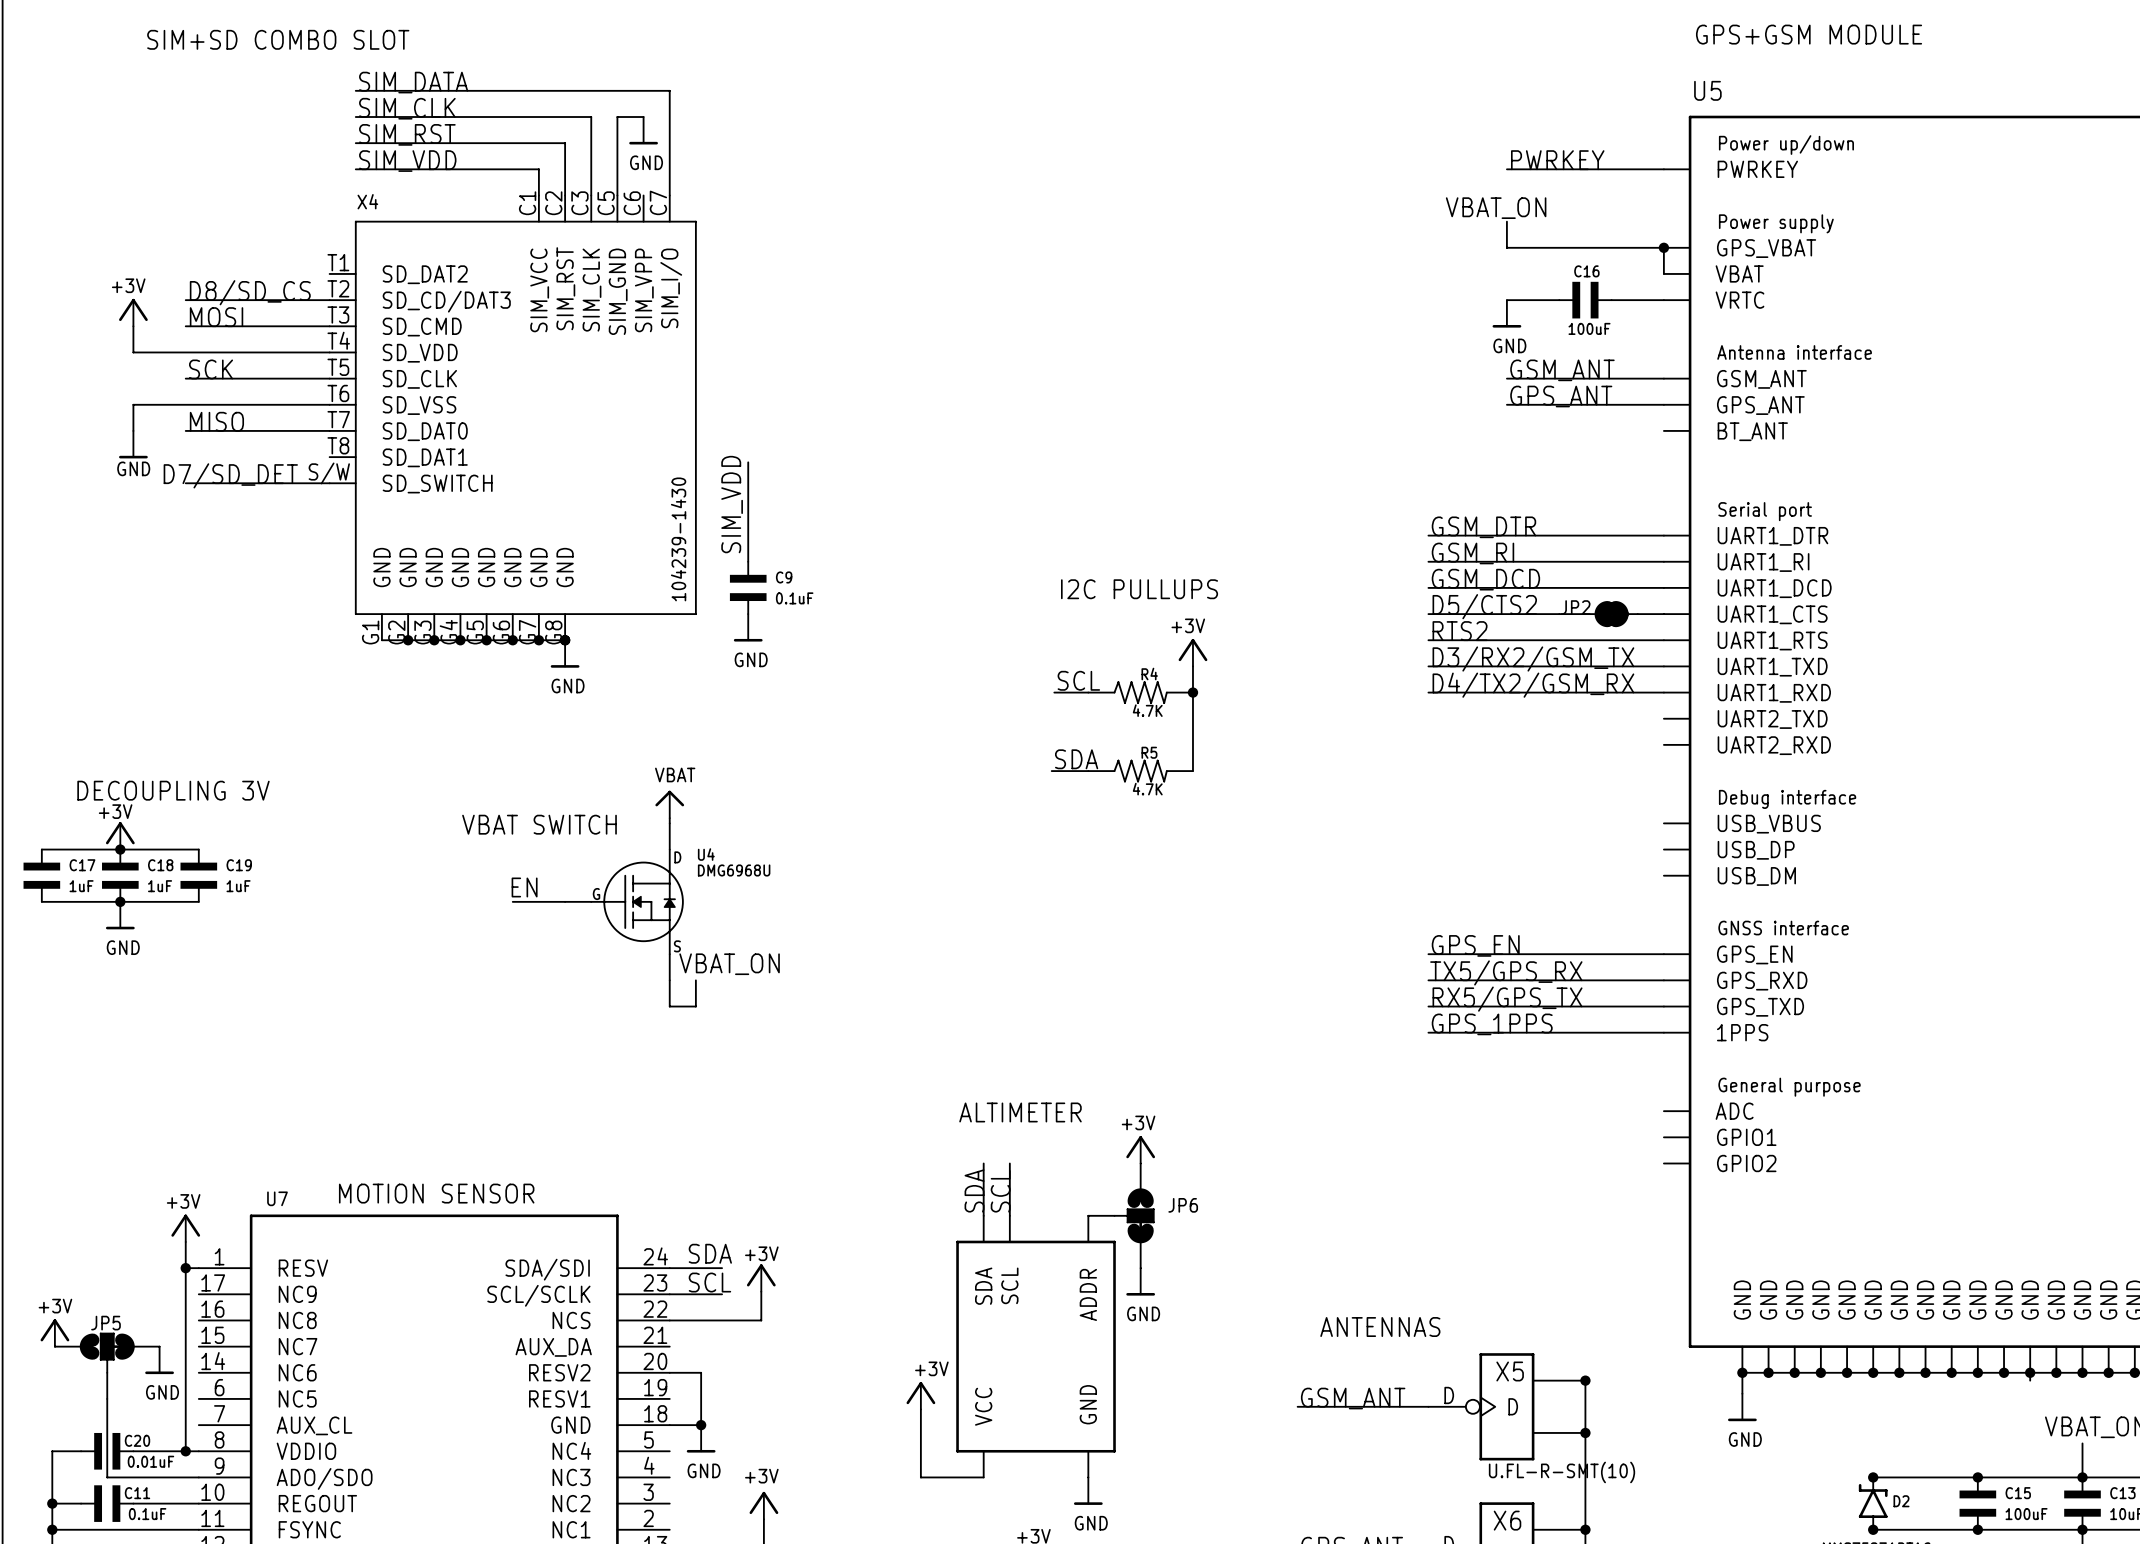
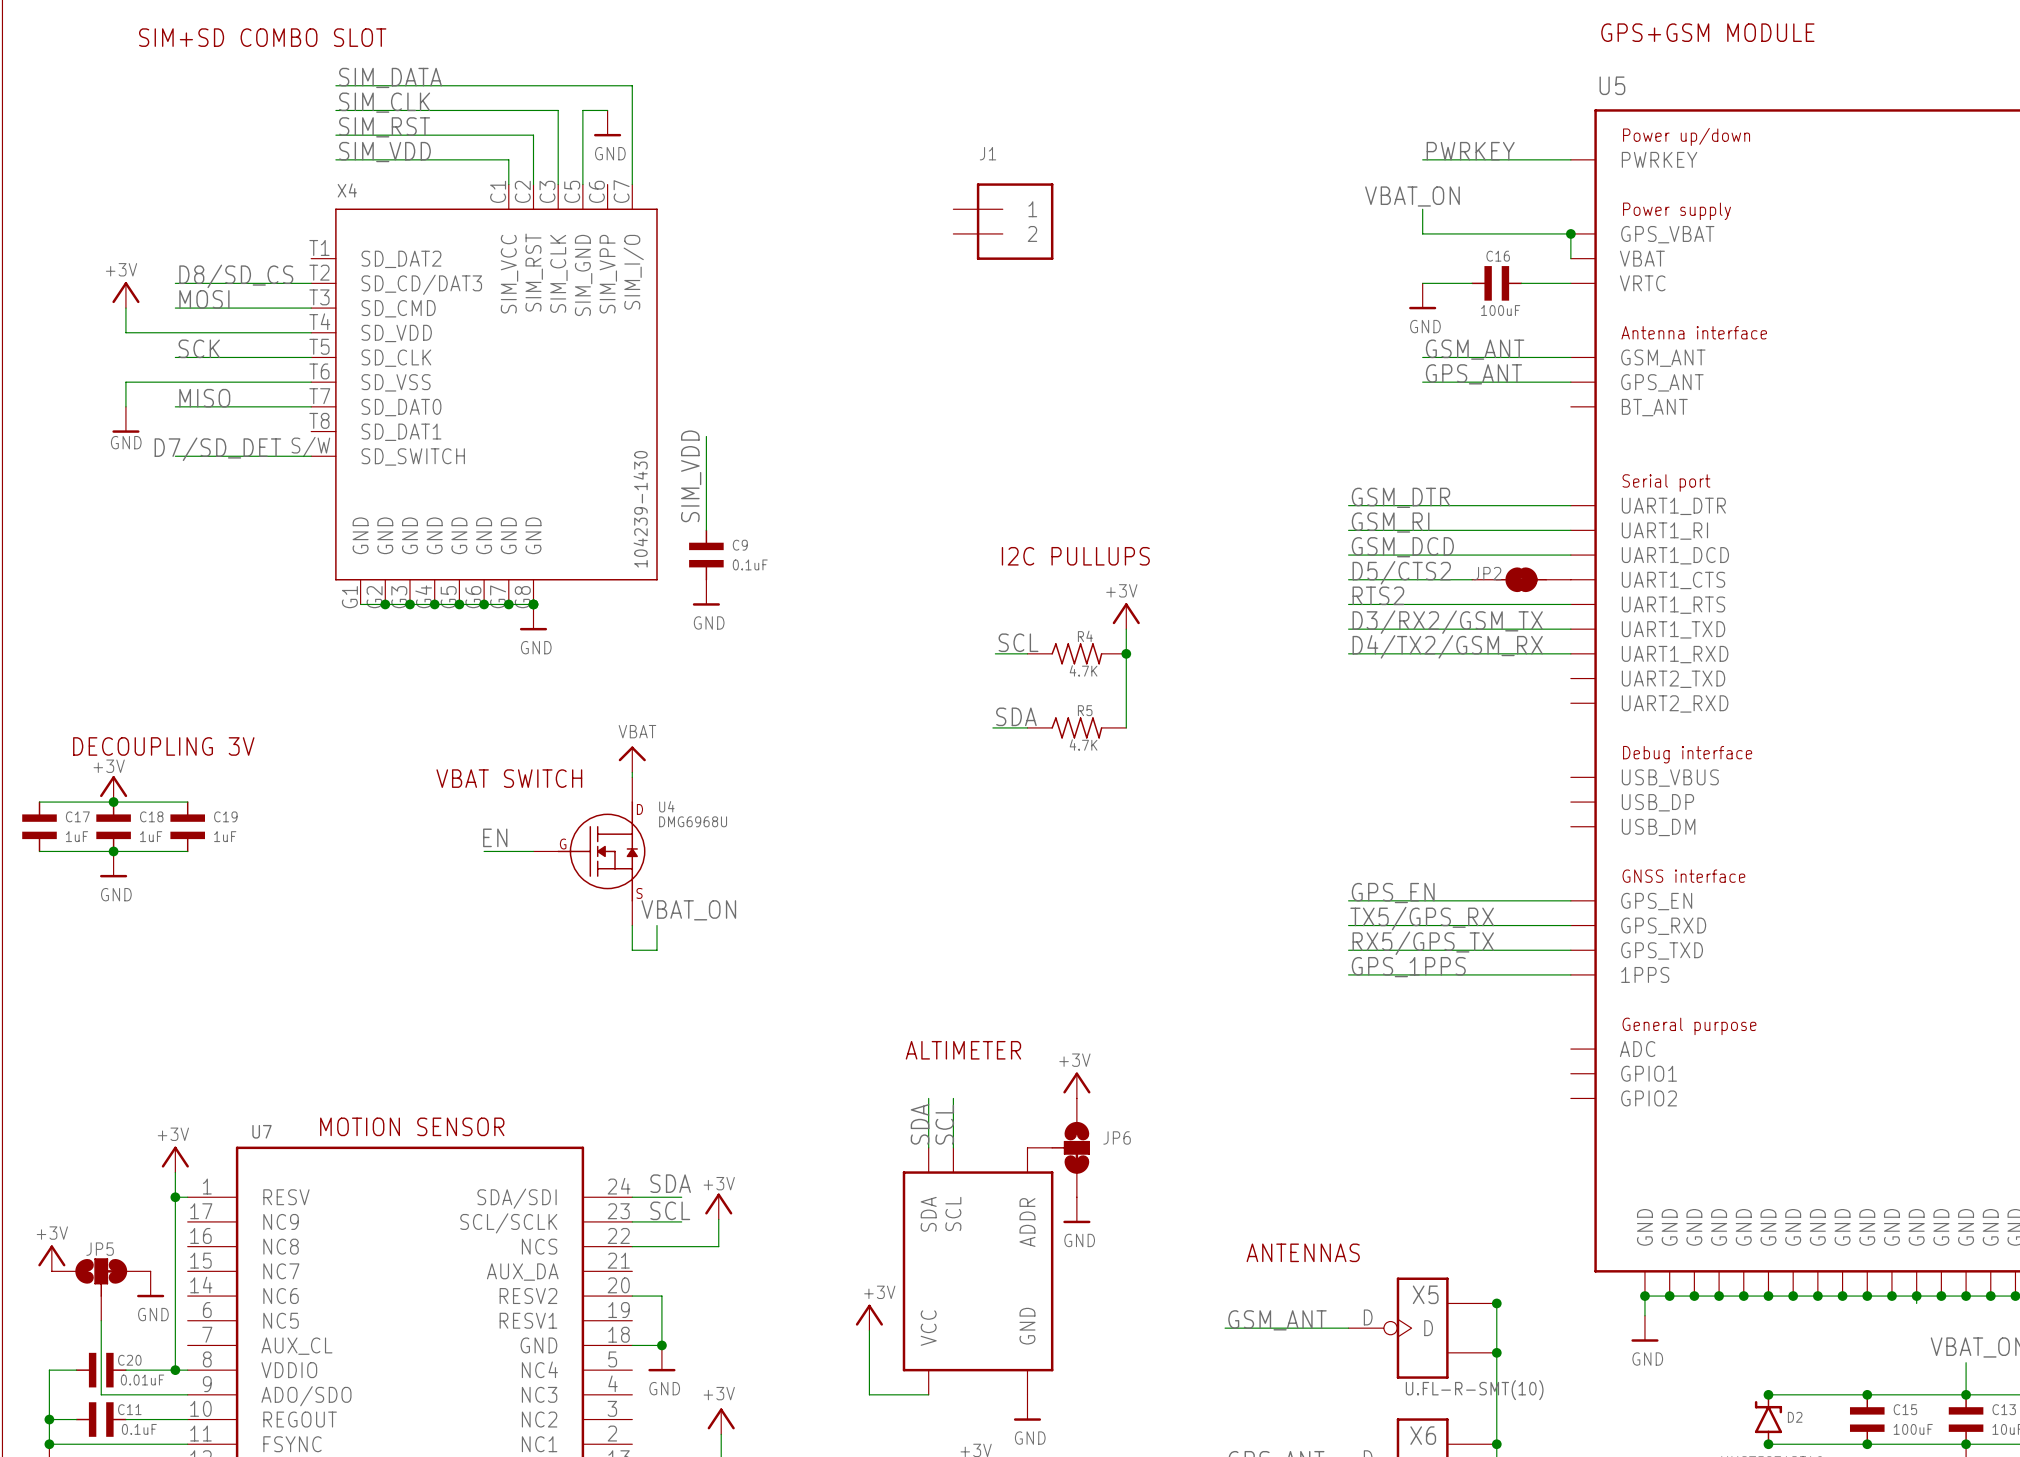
J1: none -> (1003, 221)

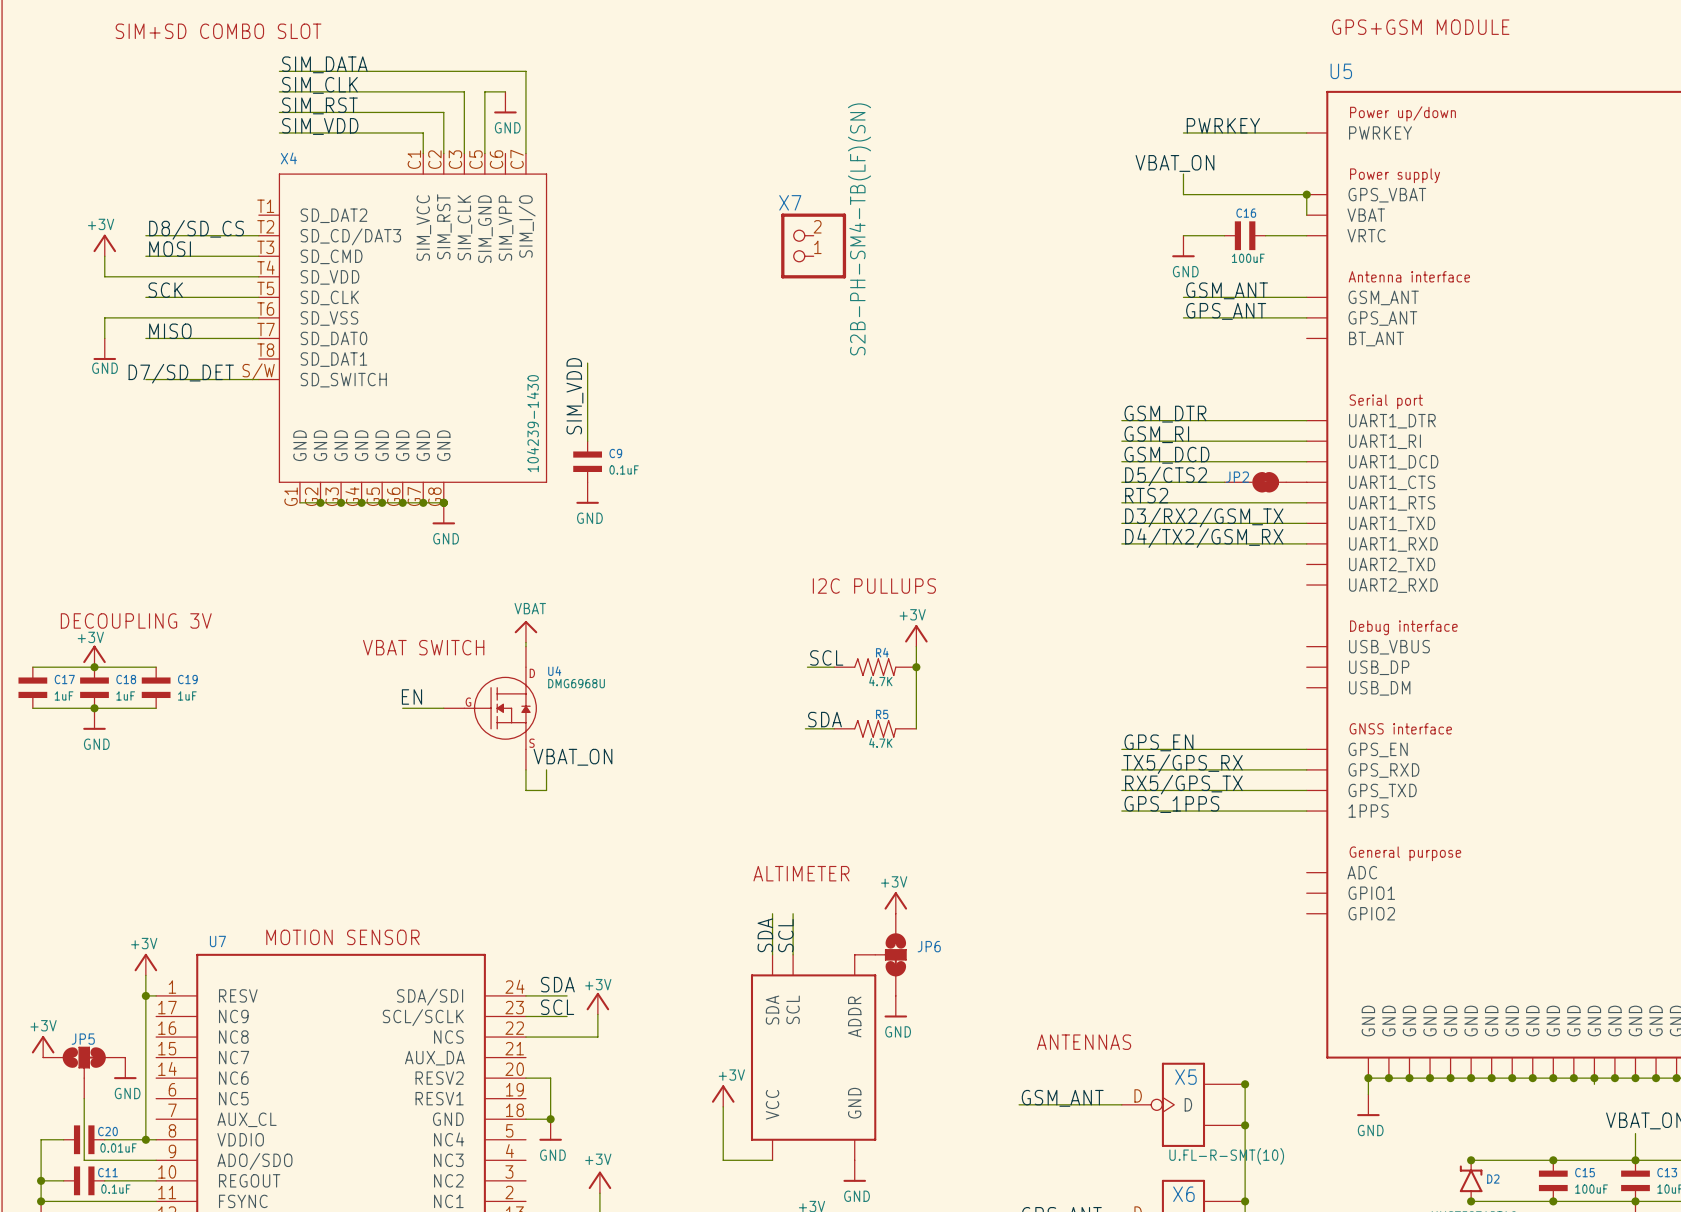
J1: (1003, 221) -> none
X7: none -> S2B-PH-SM4-TB(LF)(SN) (813, 245)
text position: I2C PULLUPS (1075, 556) -> I2C PULLUPS (874, 586)
power symbol position: +3V (1126, 616) -> +3V (916, 635)
wire: (1126, 629) (1126, 727) -> (916, 646) (916, 728)
label position: SCL (1018, 642) -> SCL (826, 657)
wire: (995, 653) (1027, 653) -> (807, 667) (834, 667)
R4 position: (1076, 653) -> (875, 667)
junction: (1126, 653) -> none
label position: SDA (1016, 716) -> SDA (824, 719)
wire: (992, 727) (1027, 727) -> (805, 728) (834, 728)
R5 position: (1076, 727) -> (875, 728)
junction: none -> (916, 667)

